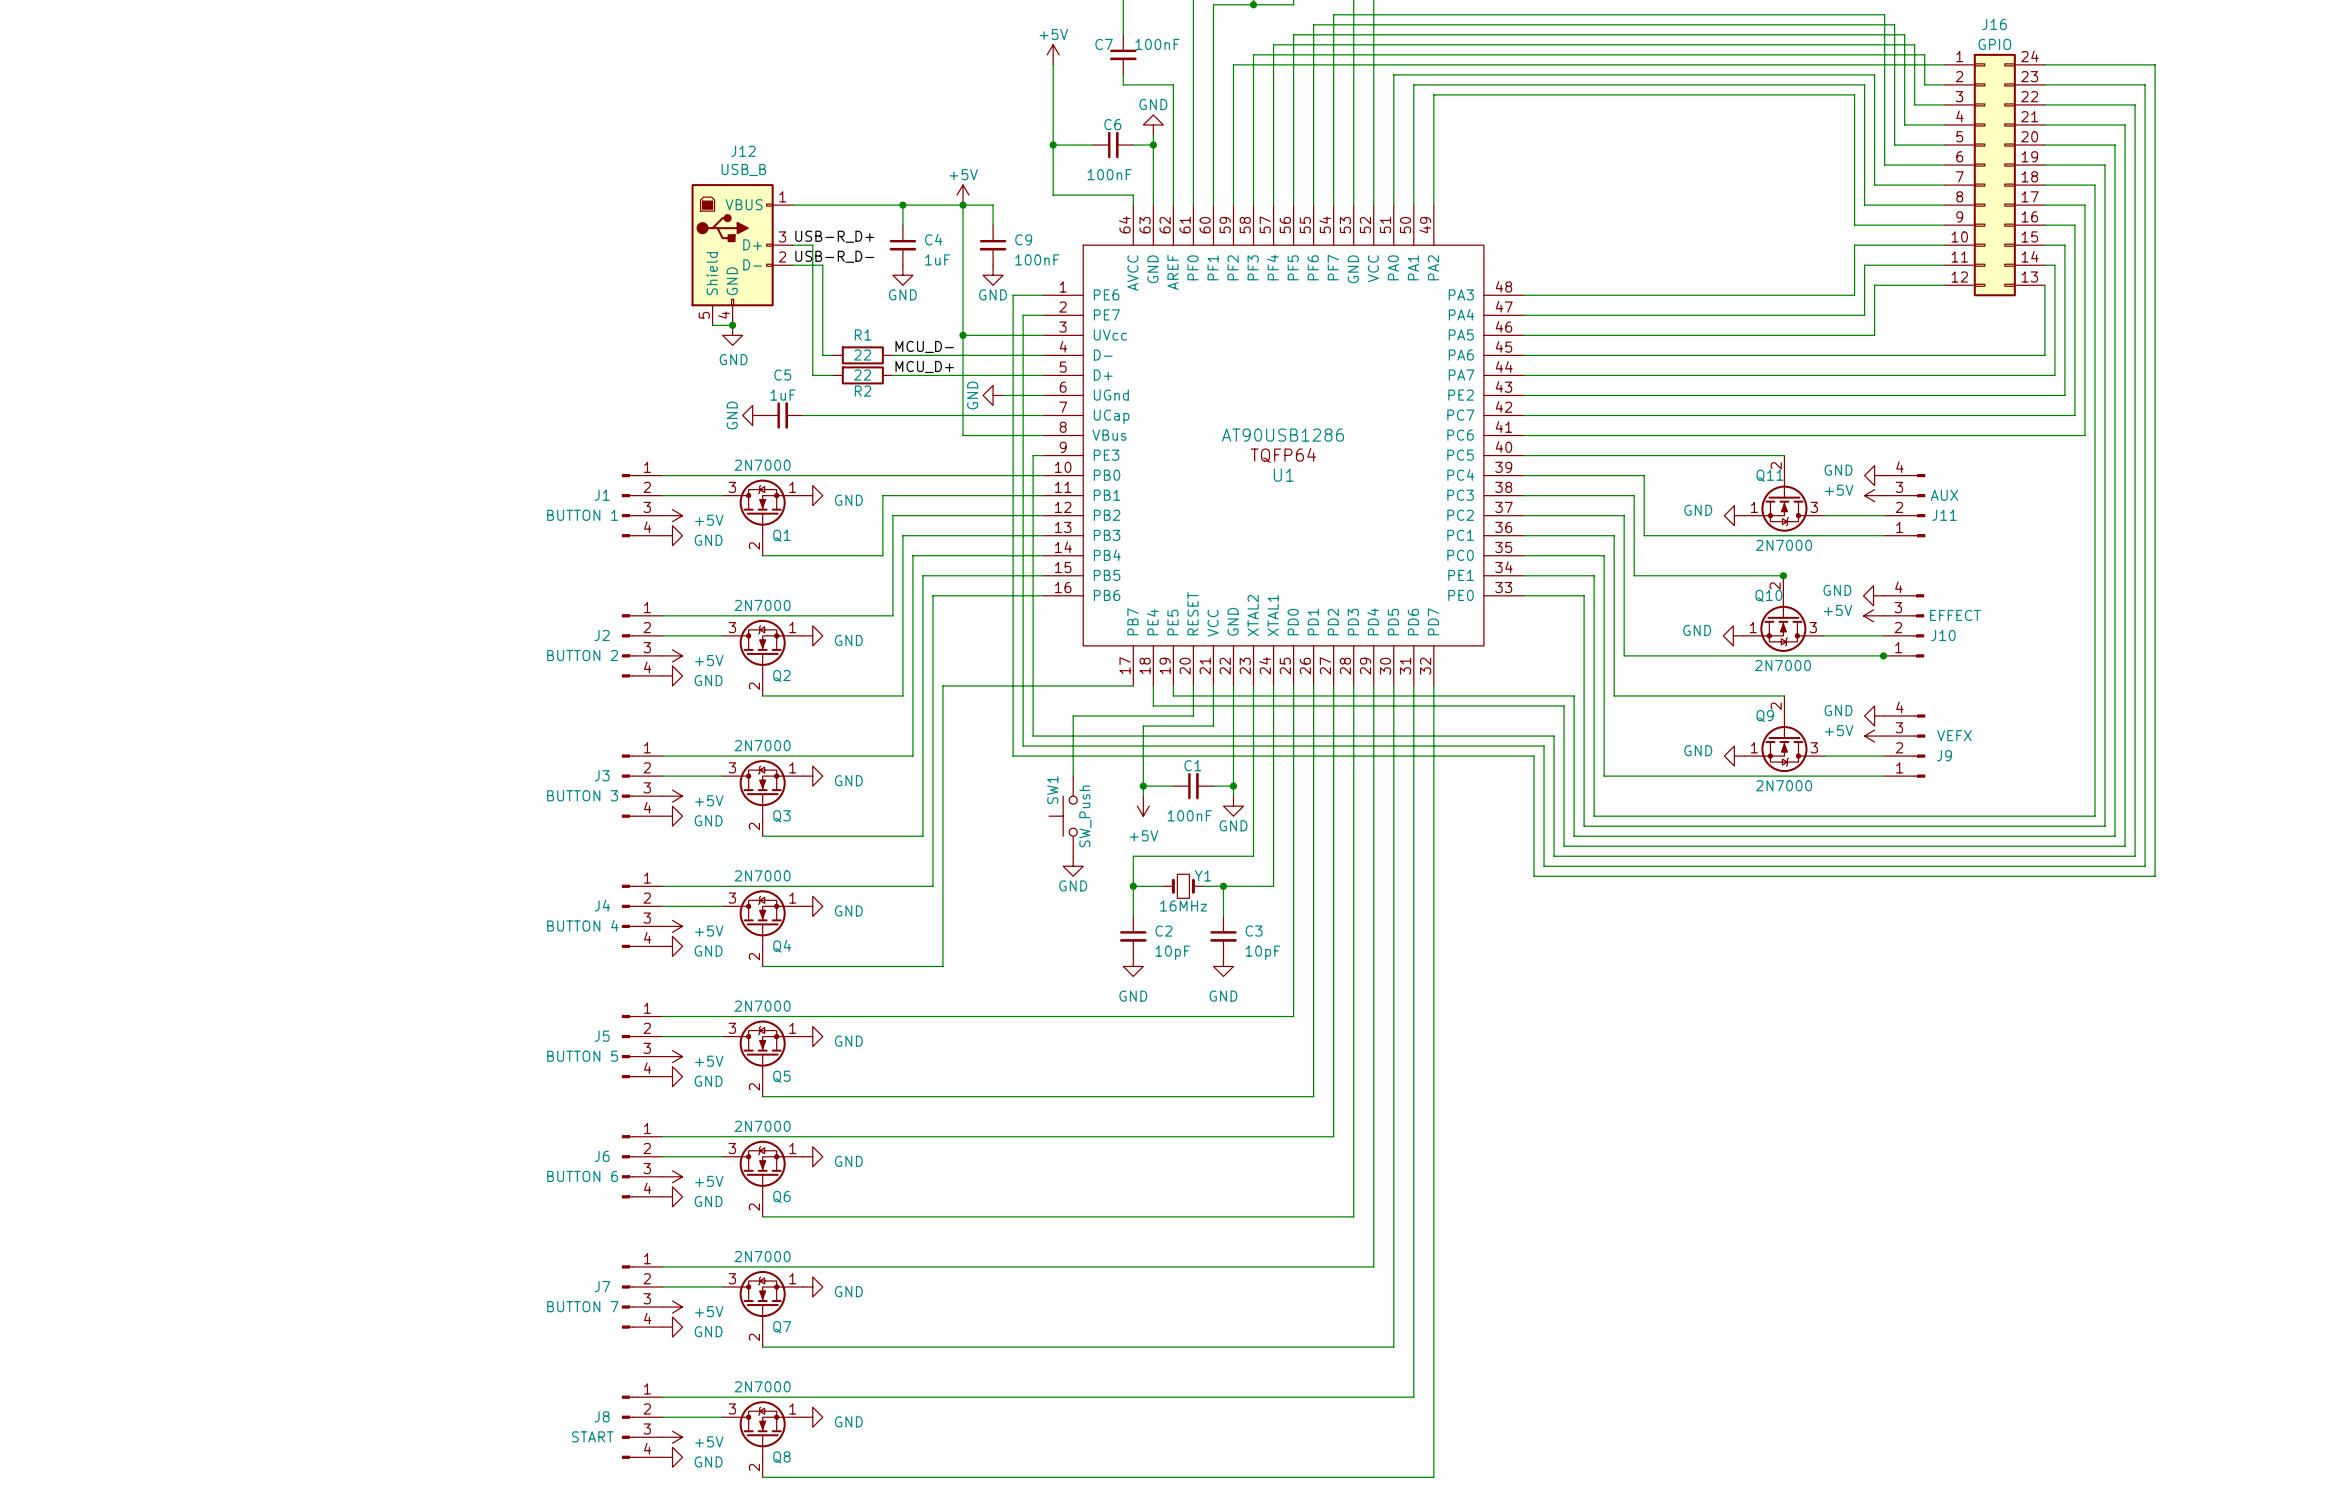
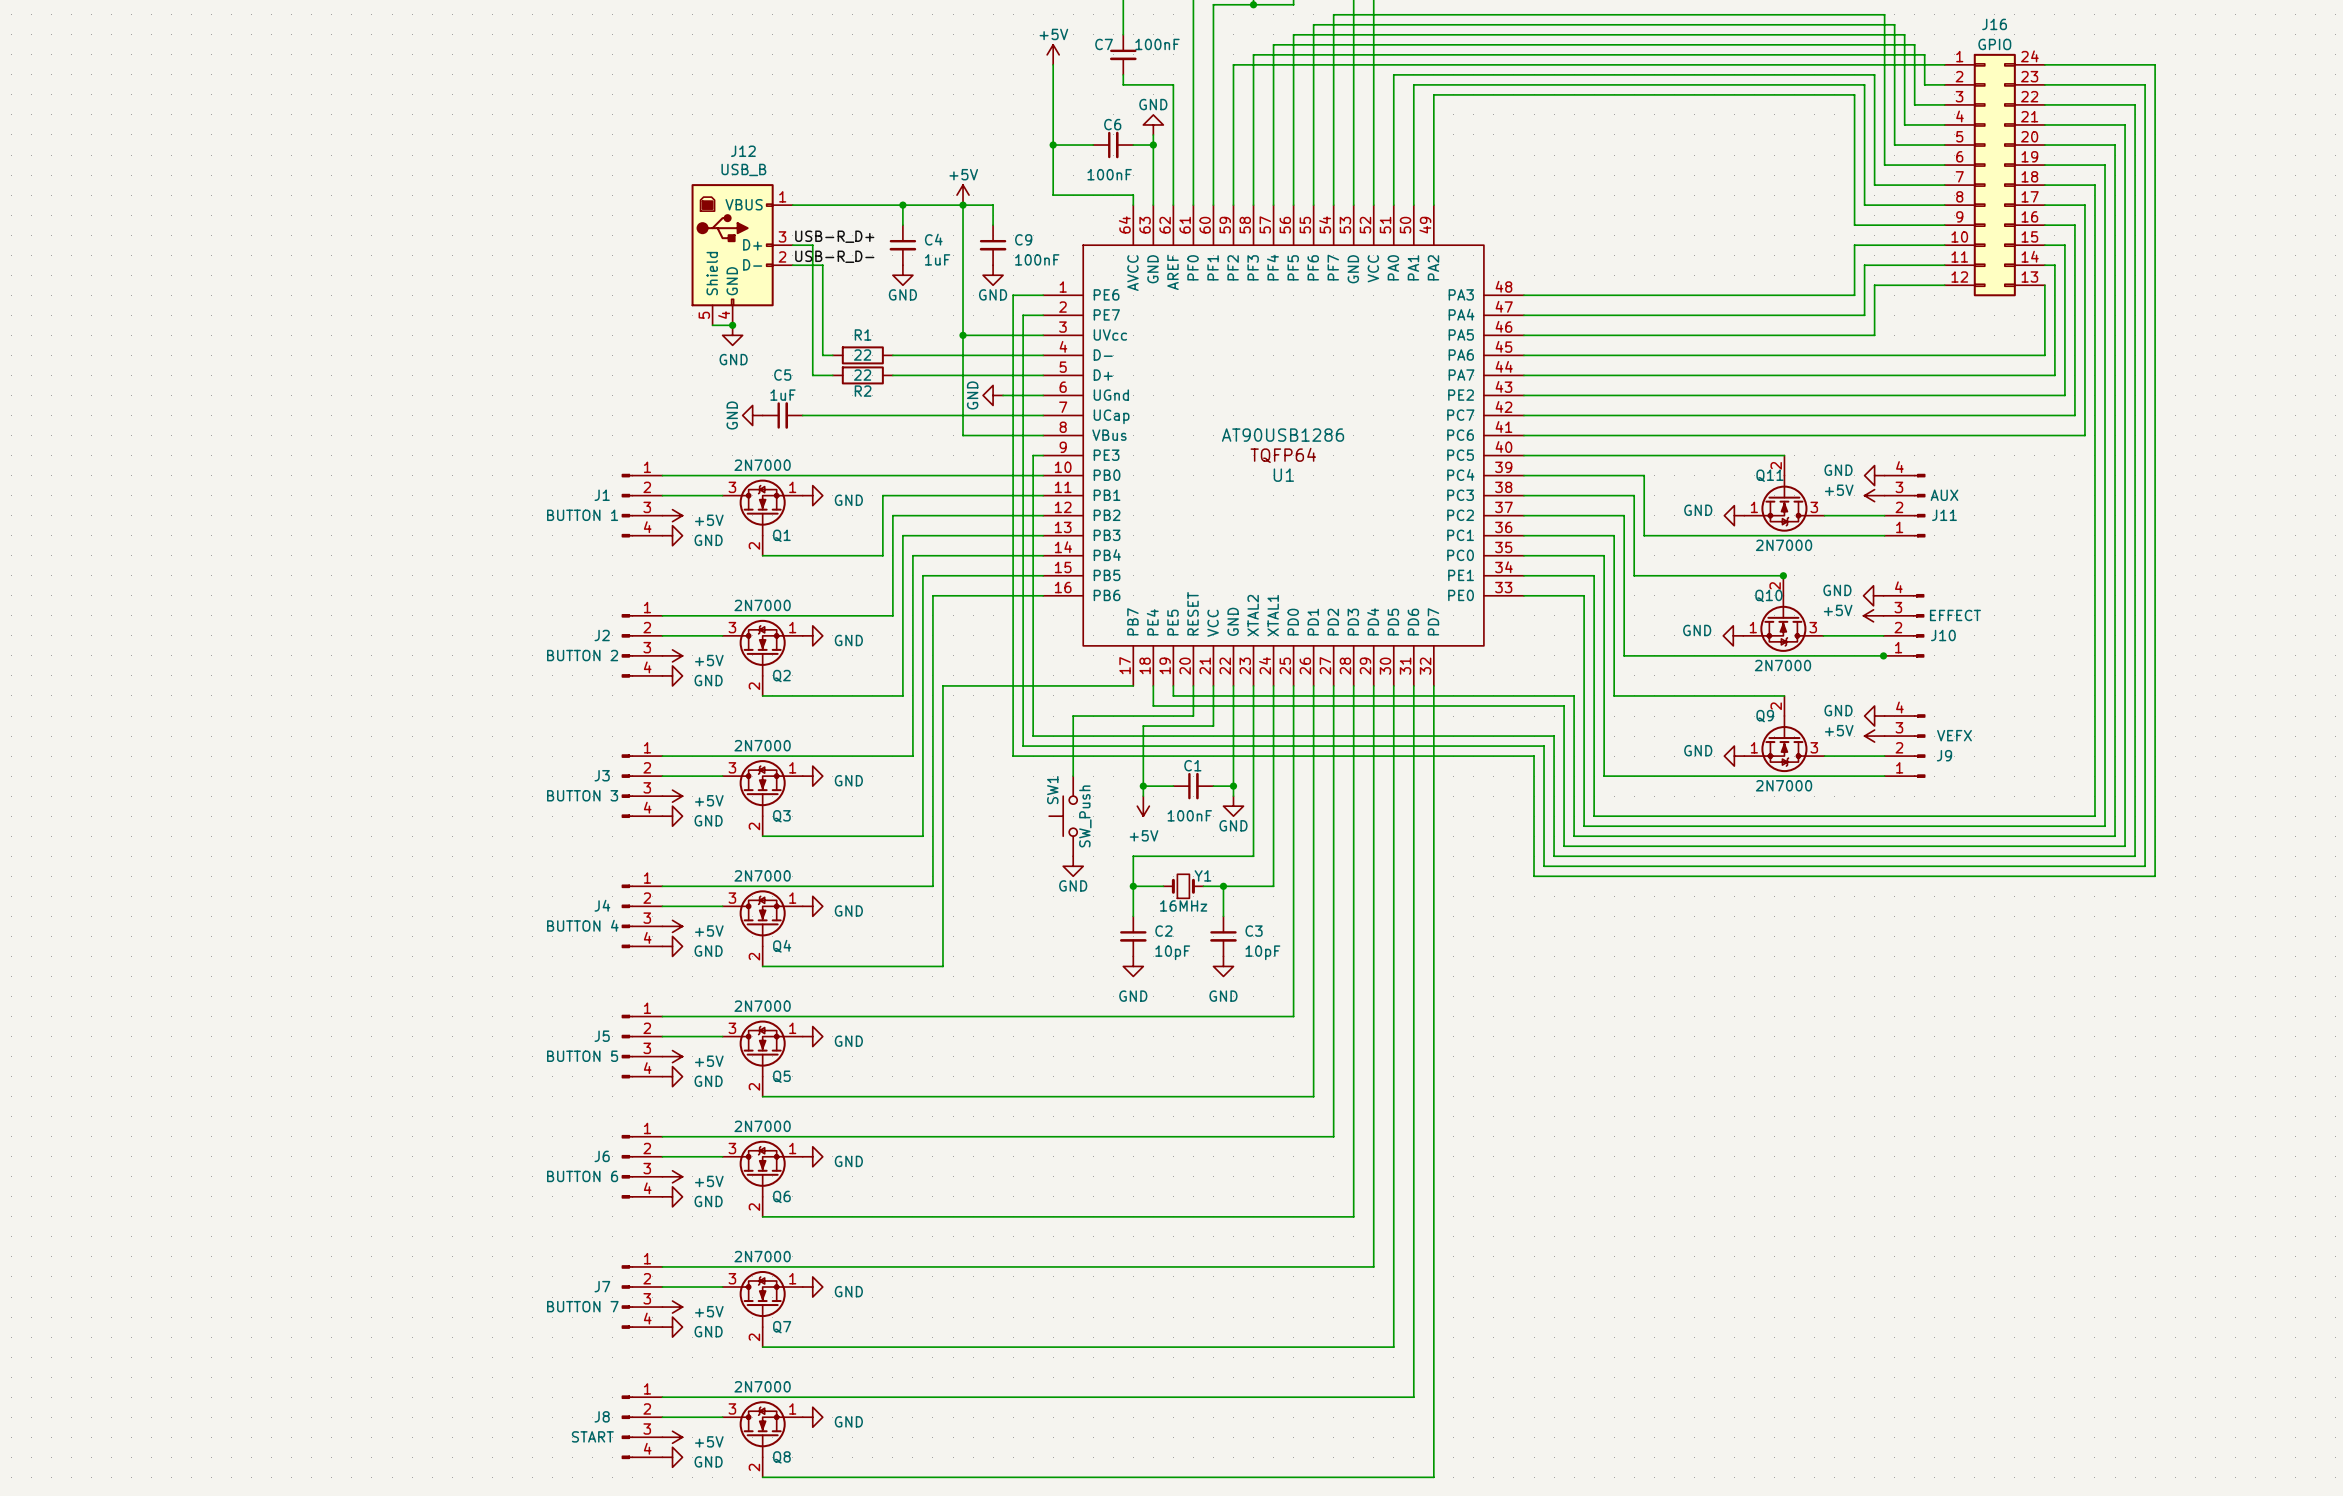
label: MCU_D- (924, 346) -> none
label: MCU_D+ (924, 366) -> none

